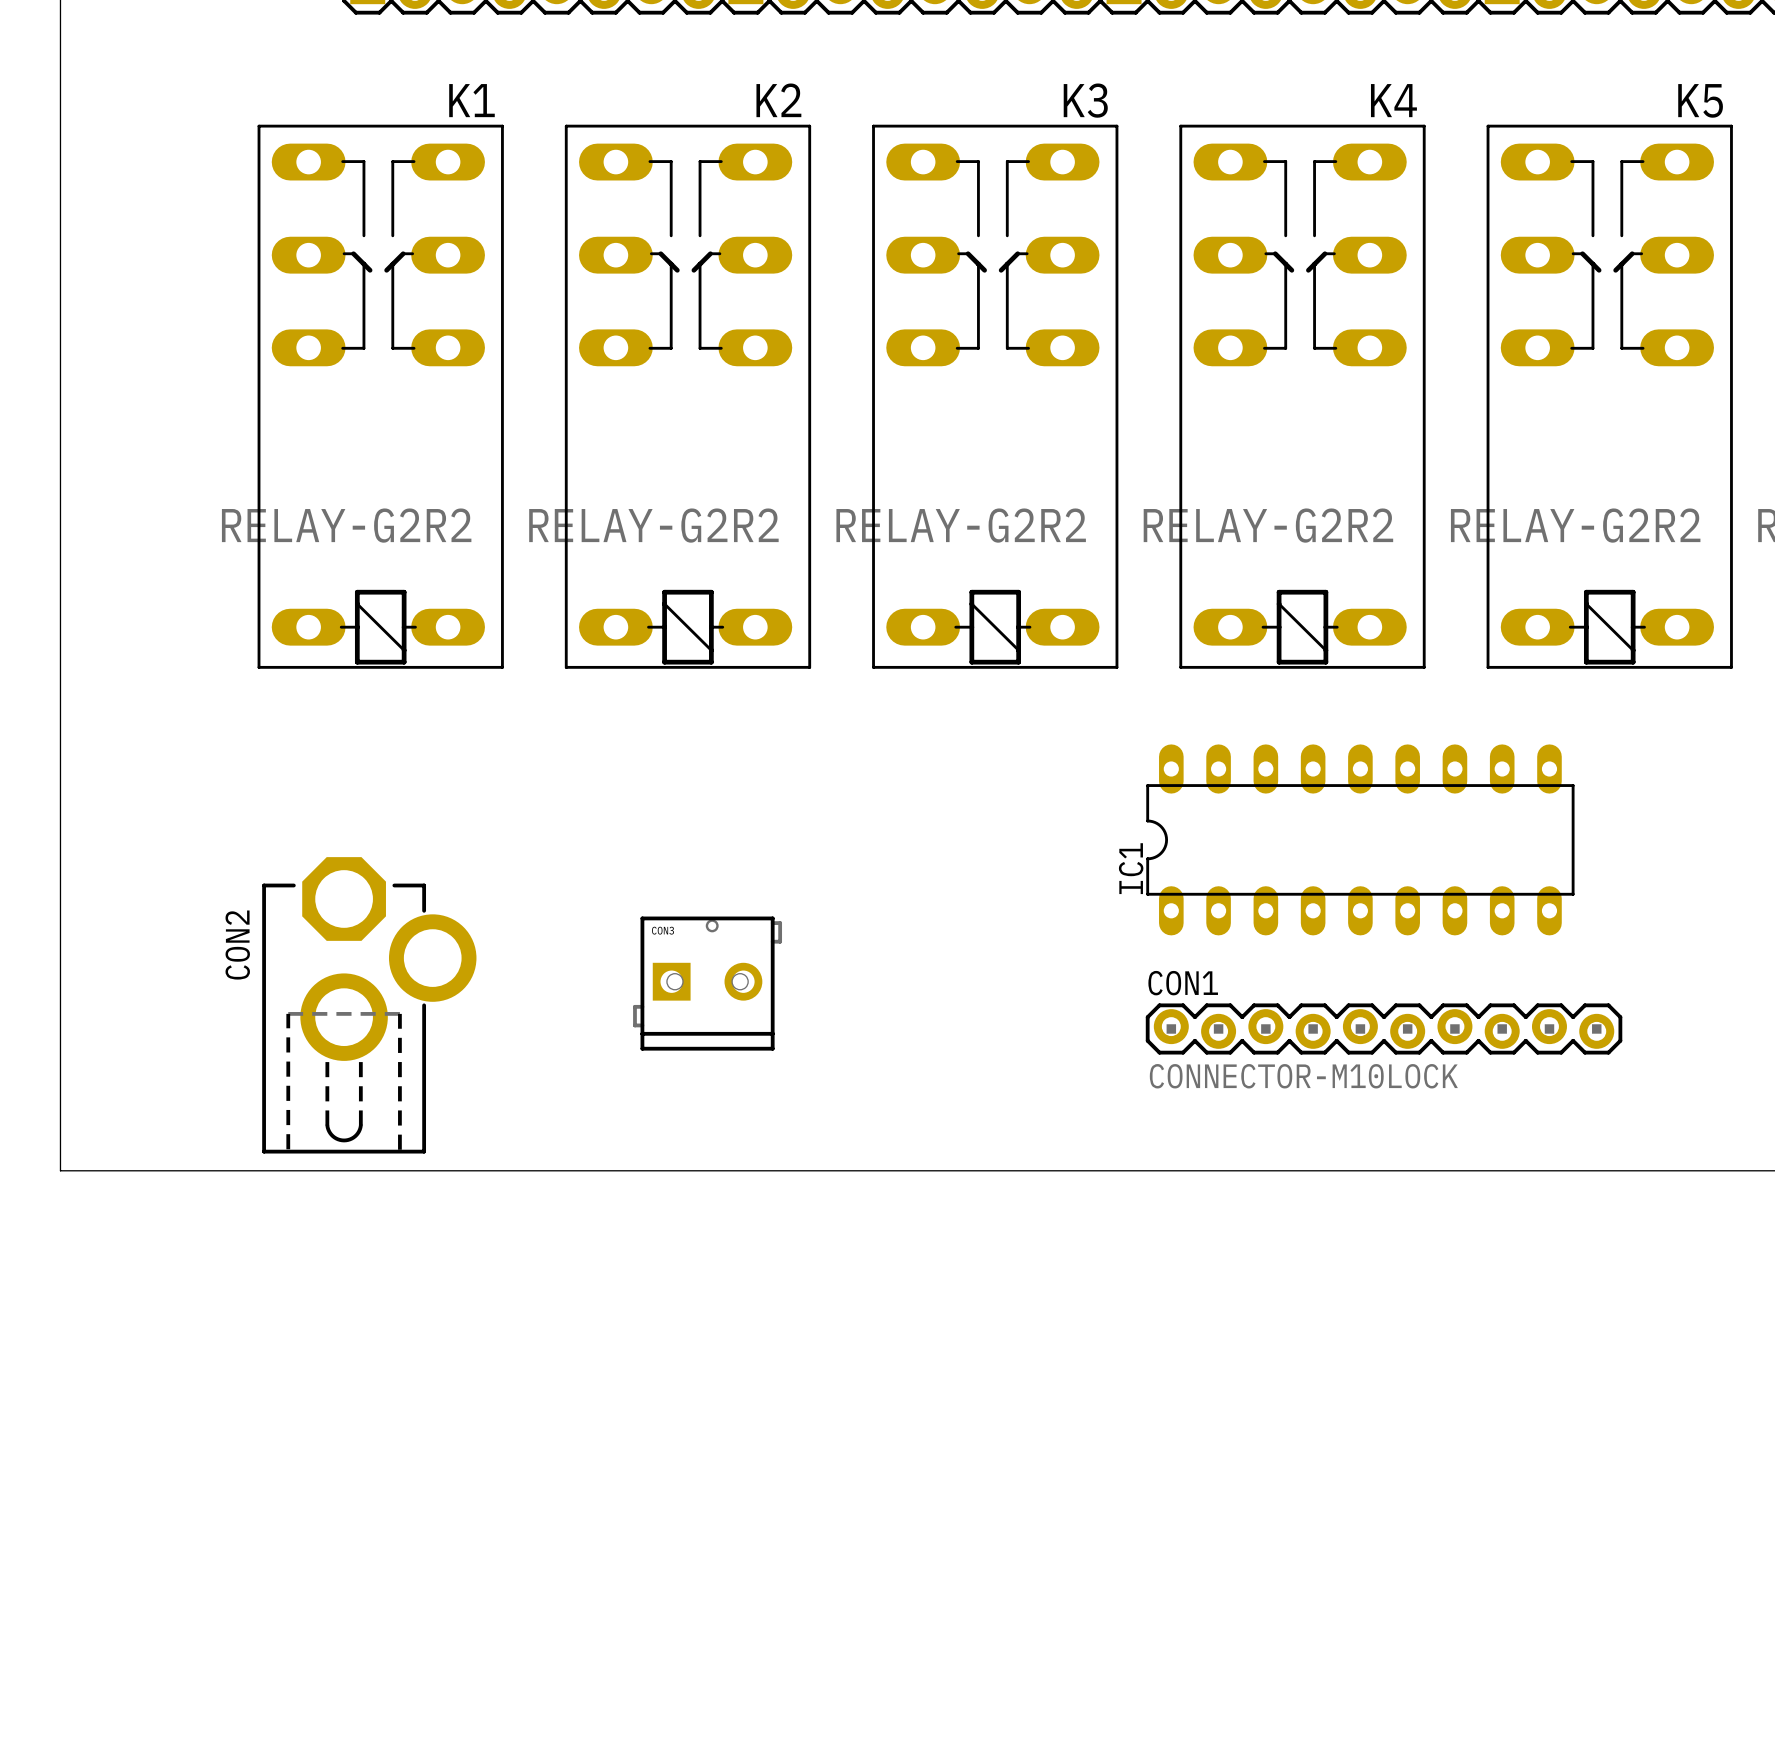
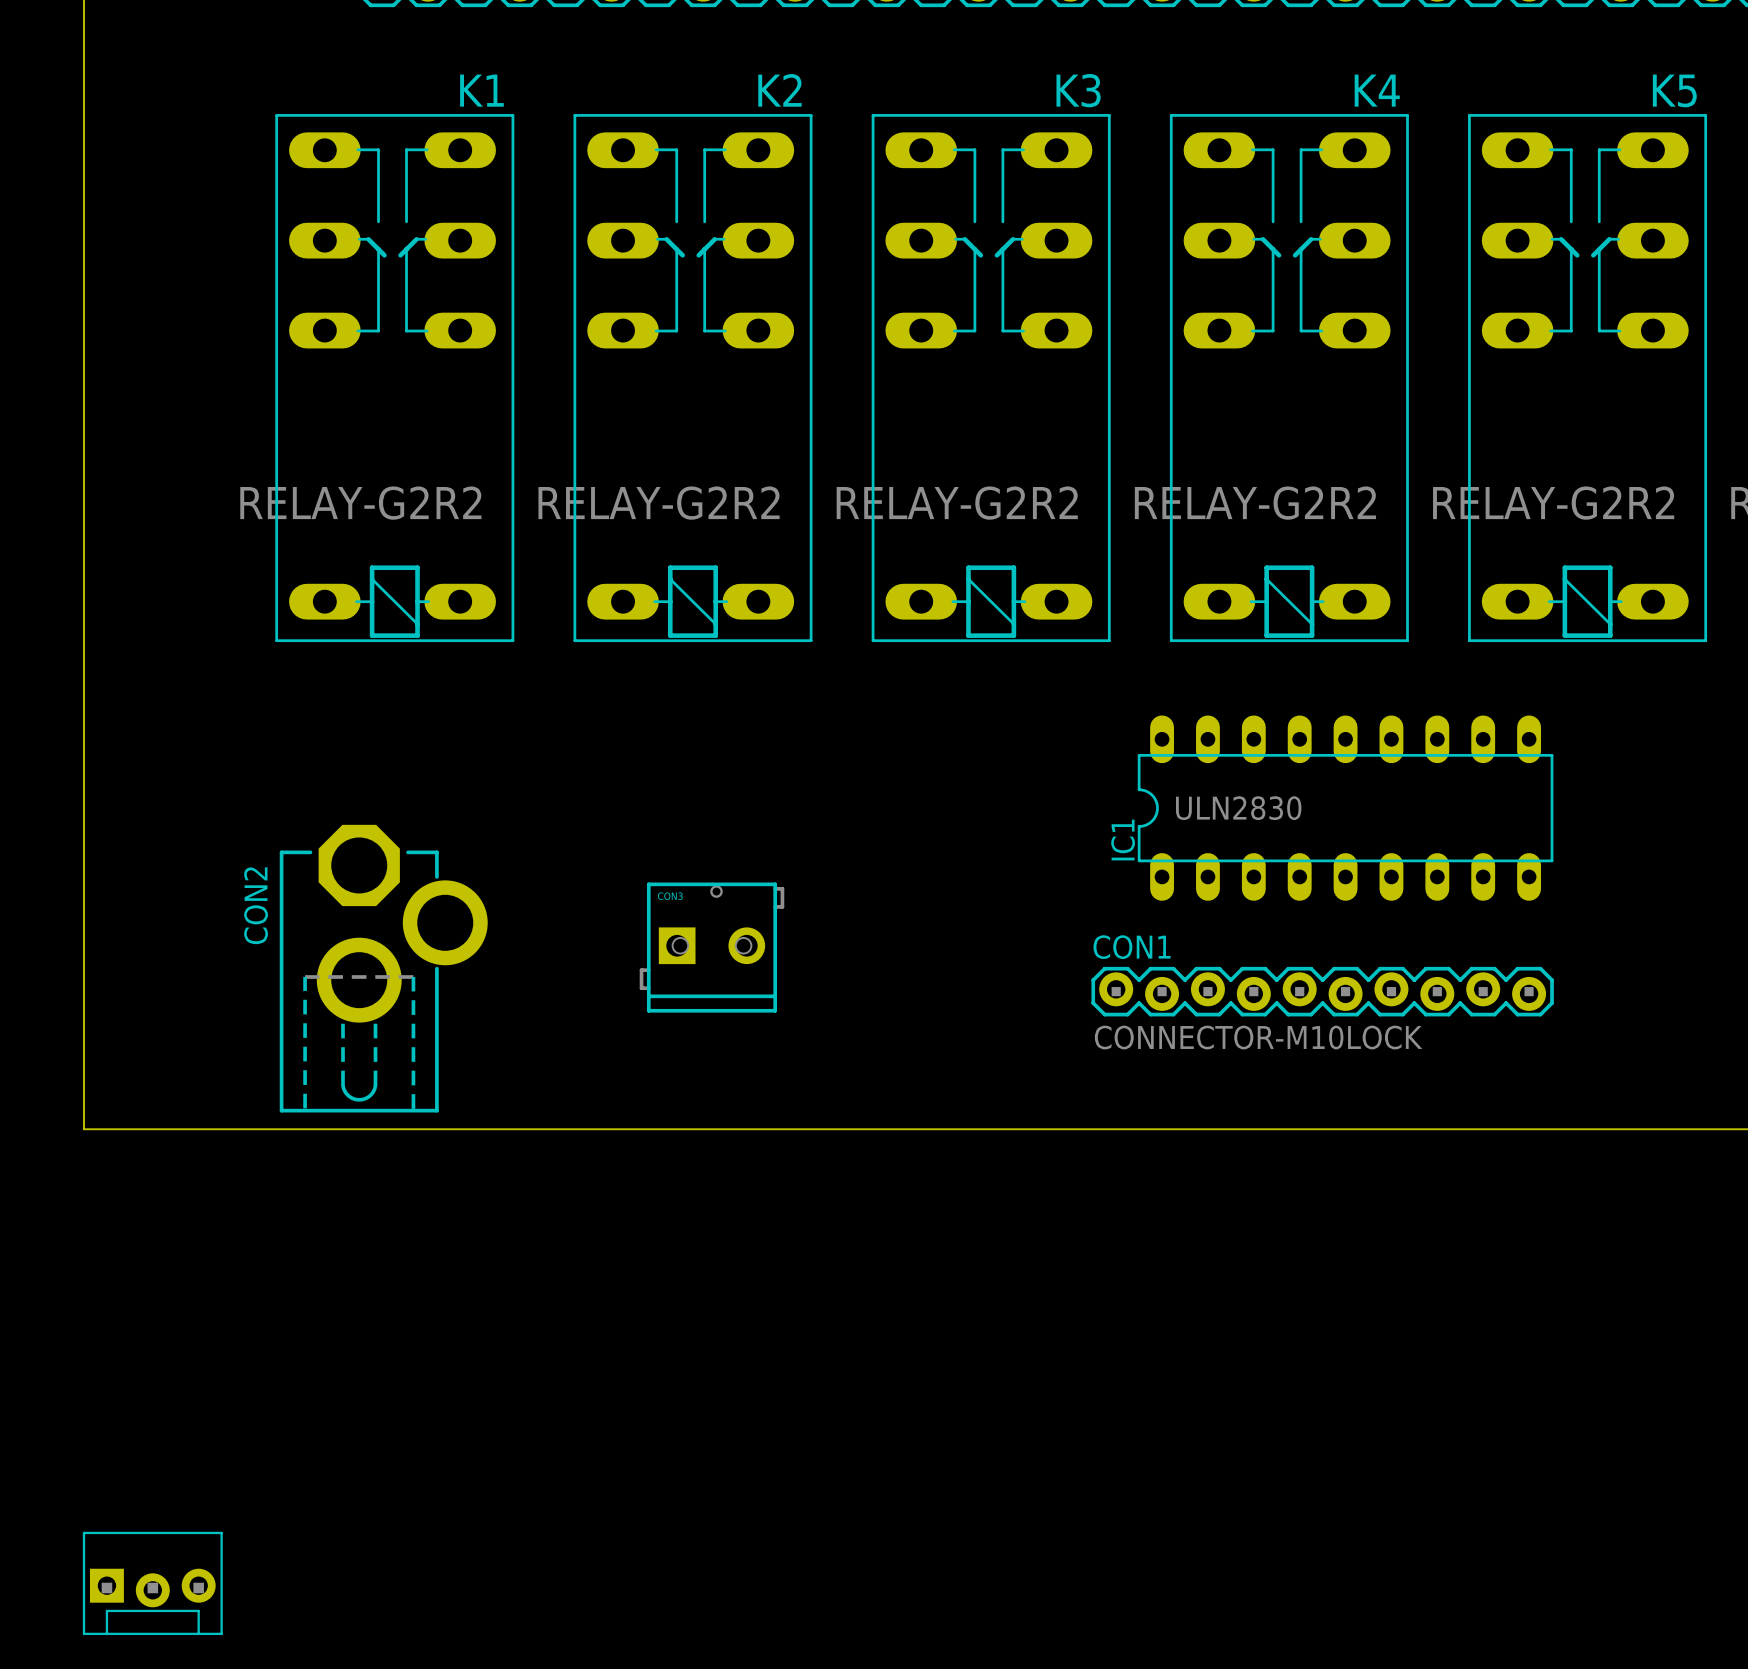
IC1 value: none -> ULN2830 (1238, 808)
CON1 position: (1384, 1028) -> (1322, 991)
part: none -> (152, 1583)

